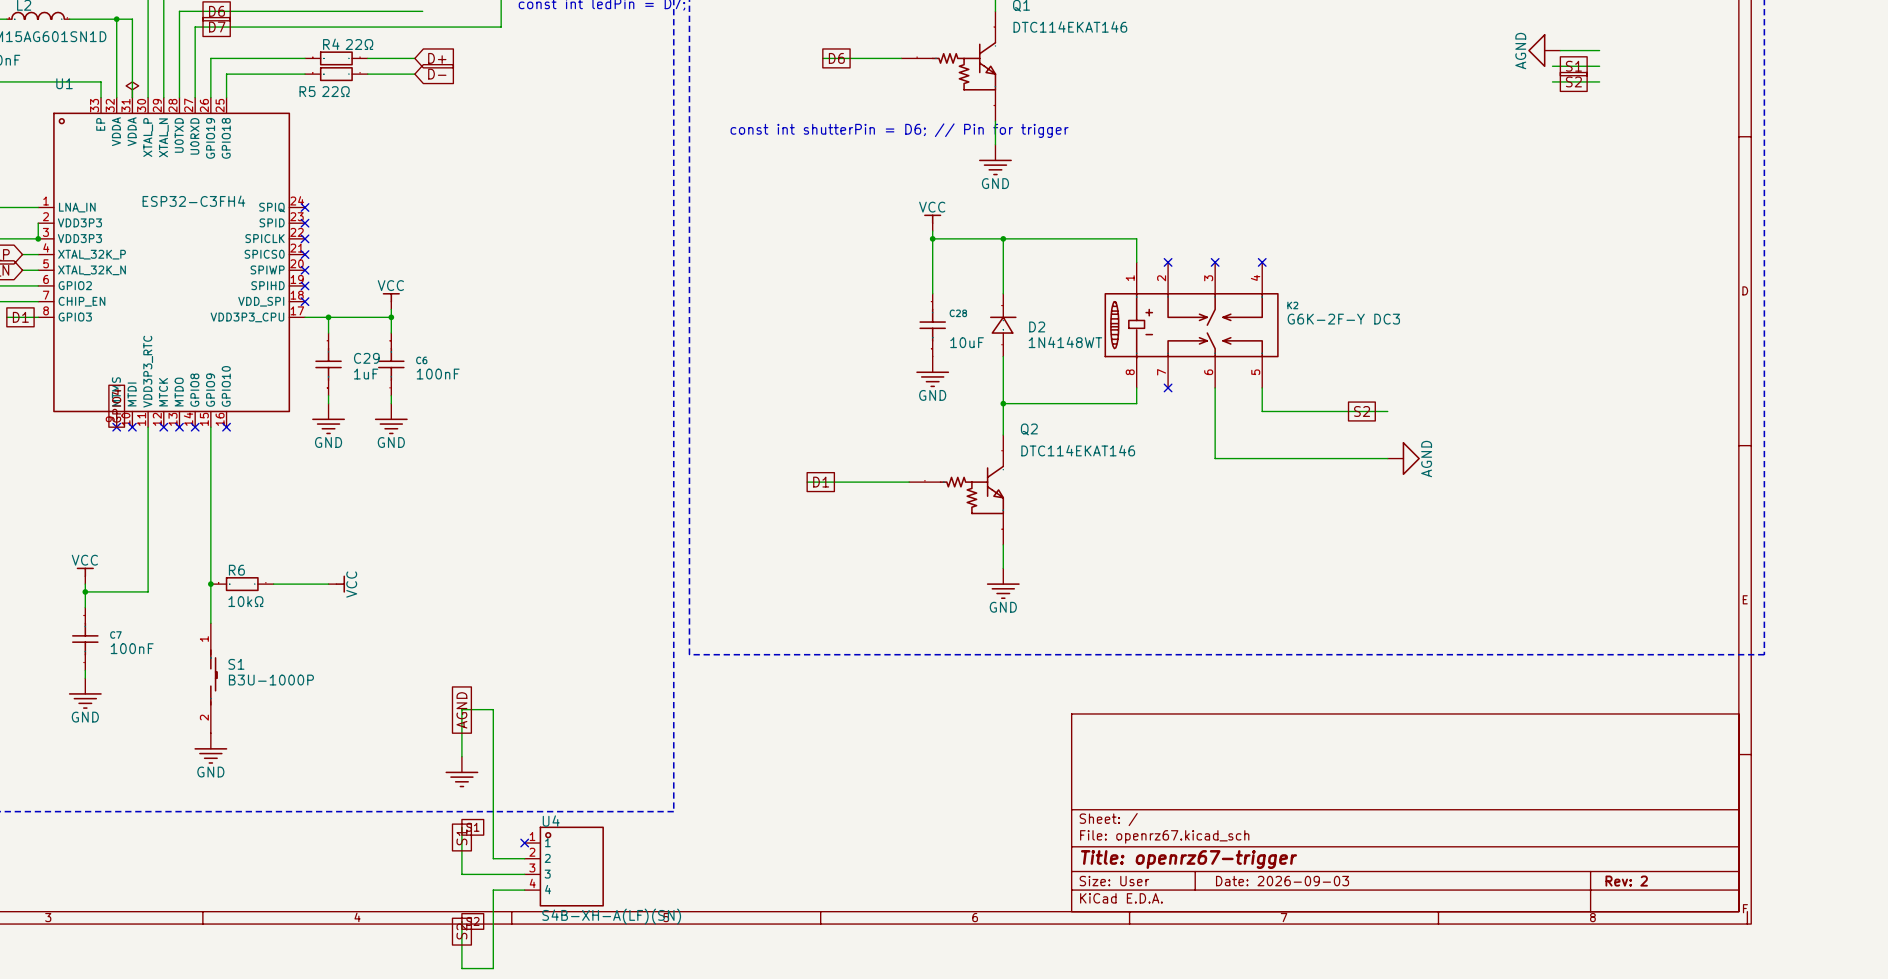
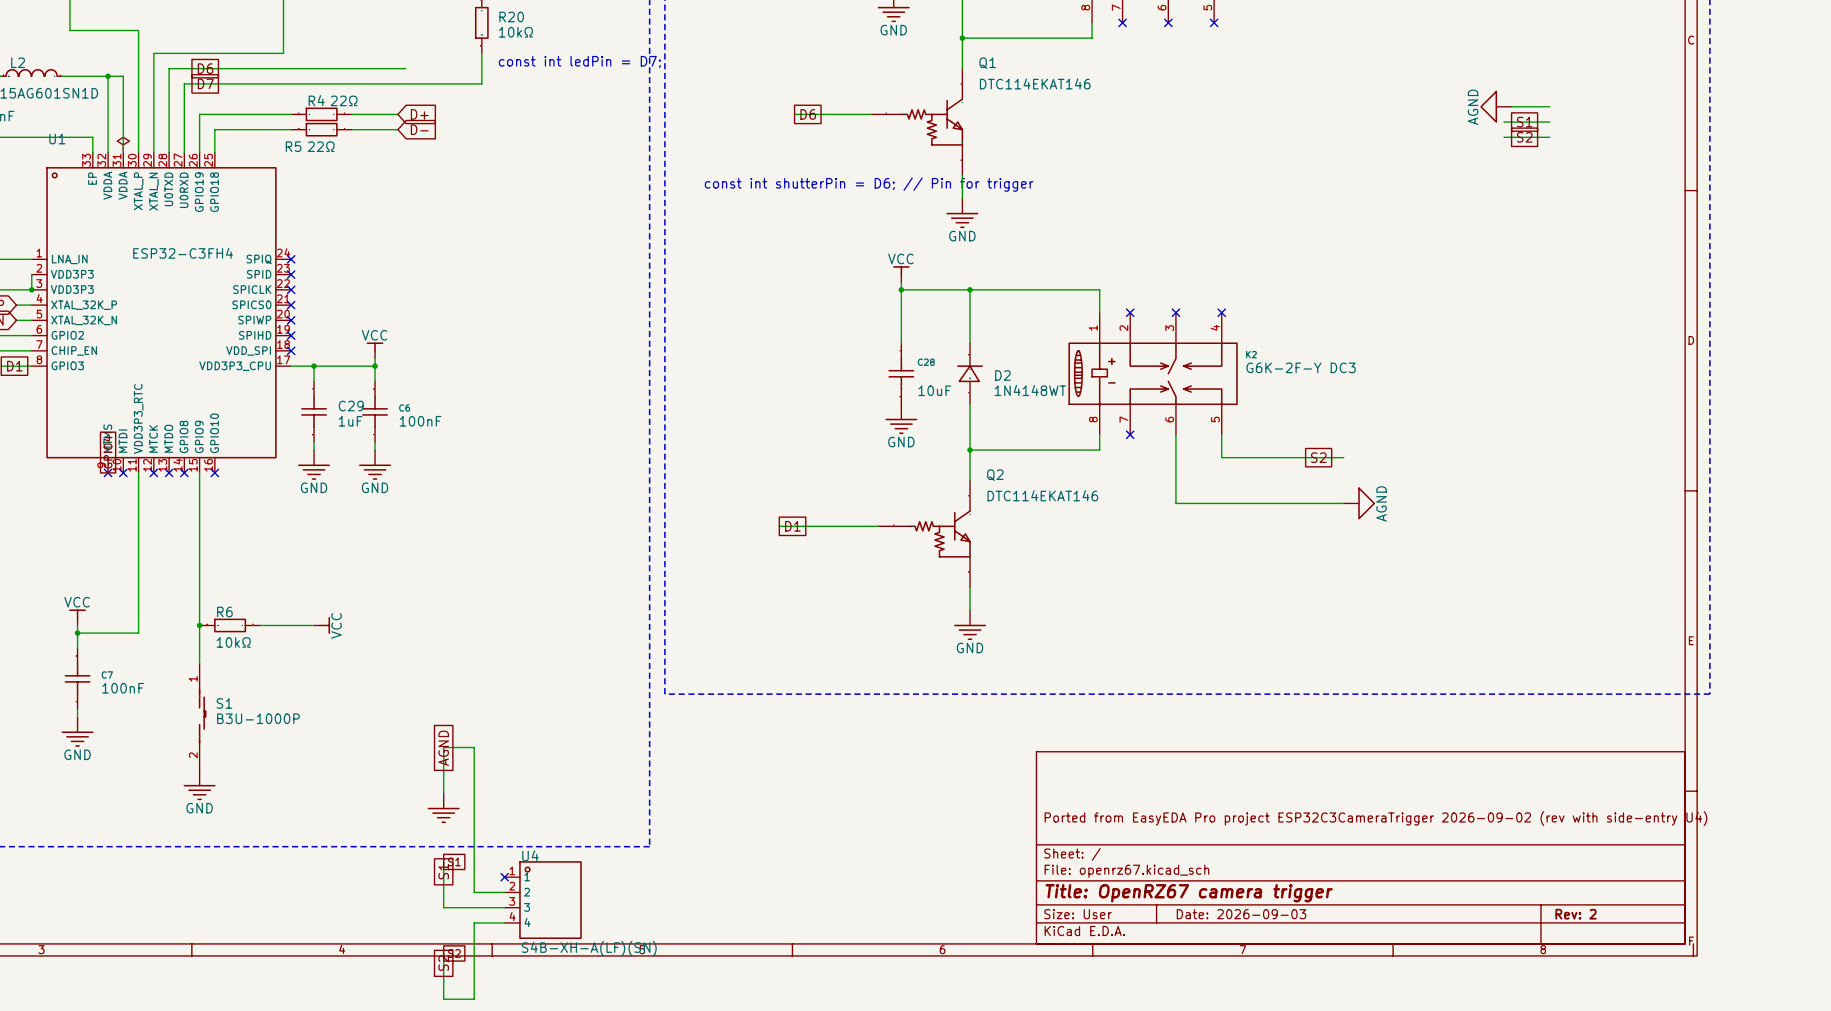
title block: none -> Ported from EasyEDA Pro project ESP32C3CameraTrigger 2026-09-02 (rev with side-entry U4) (1375, 818)
title block: Title: openrz67-trigger (1189, 859) -> Title: OpenRZ67 camera trigger (1189, 893)

